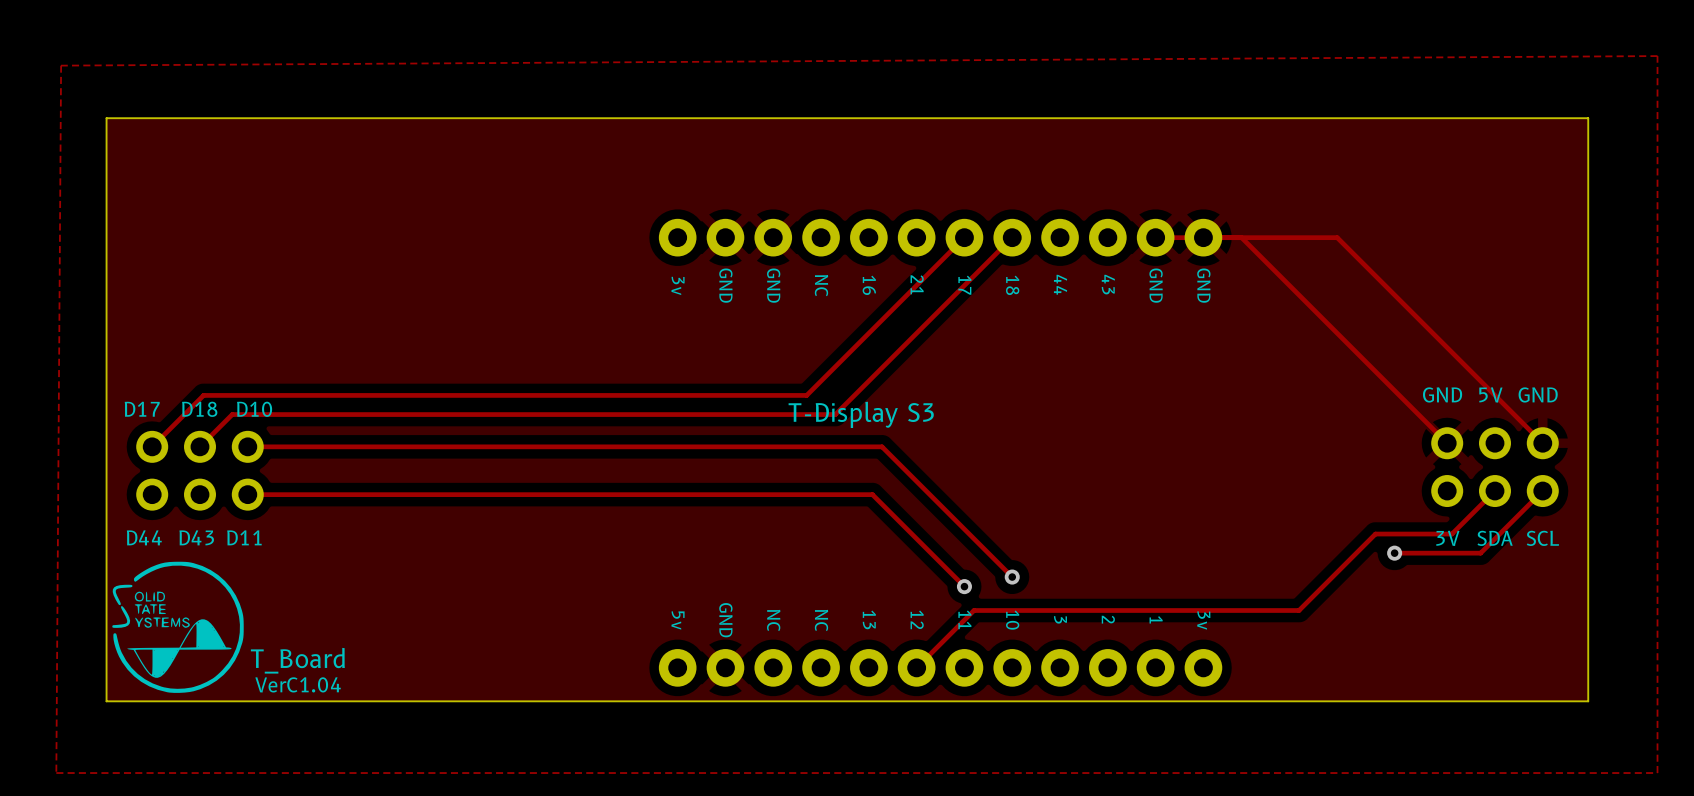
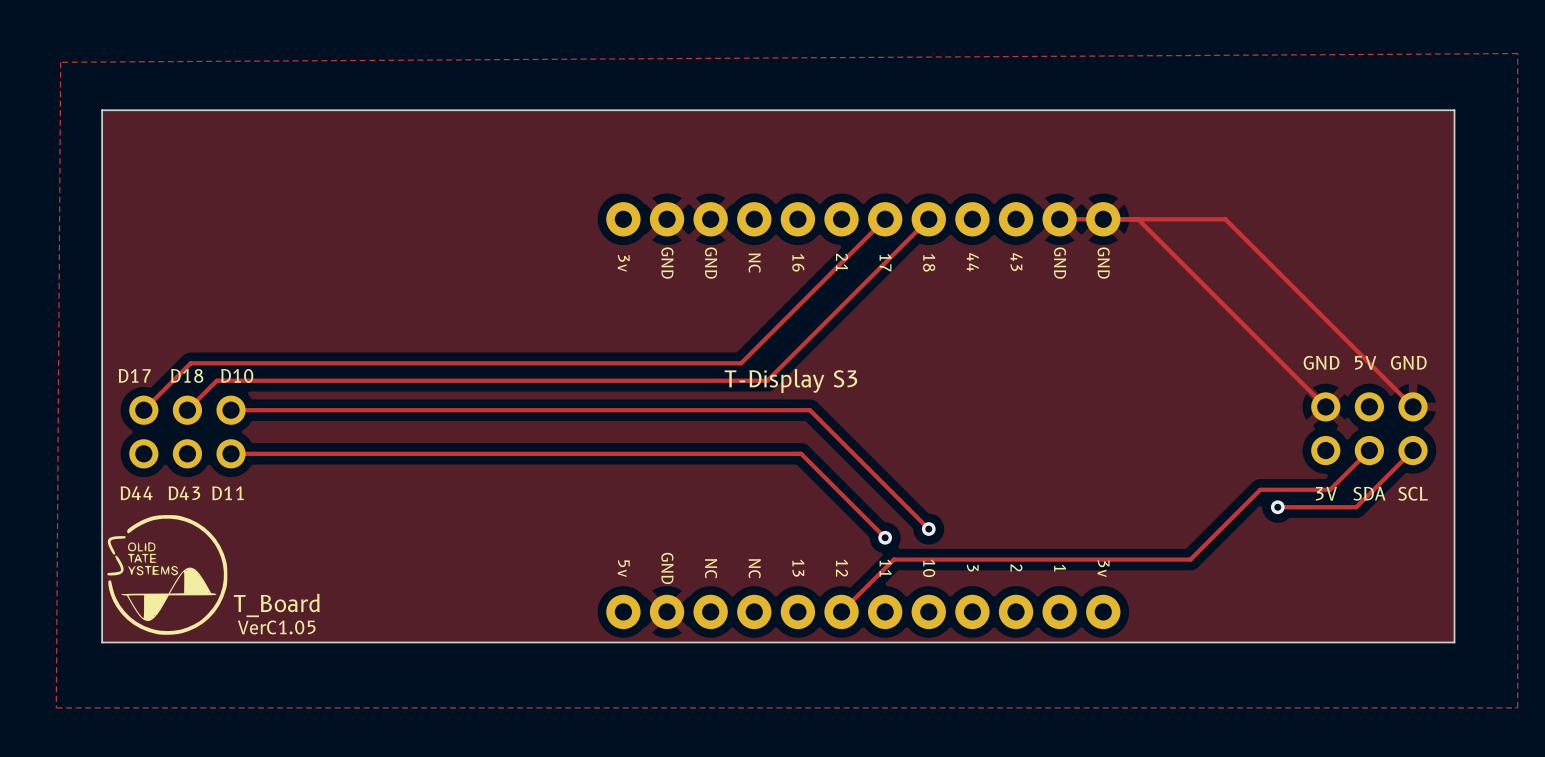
text: VerC1.04 (298, 684) -> VerC1.05 (276, 627)

